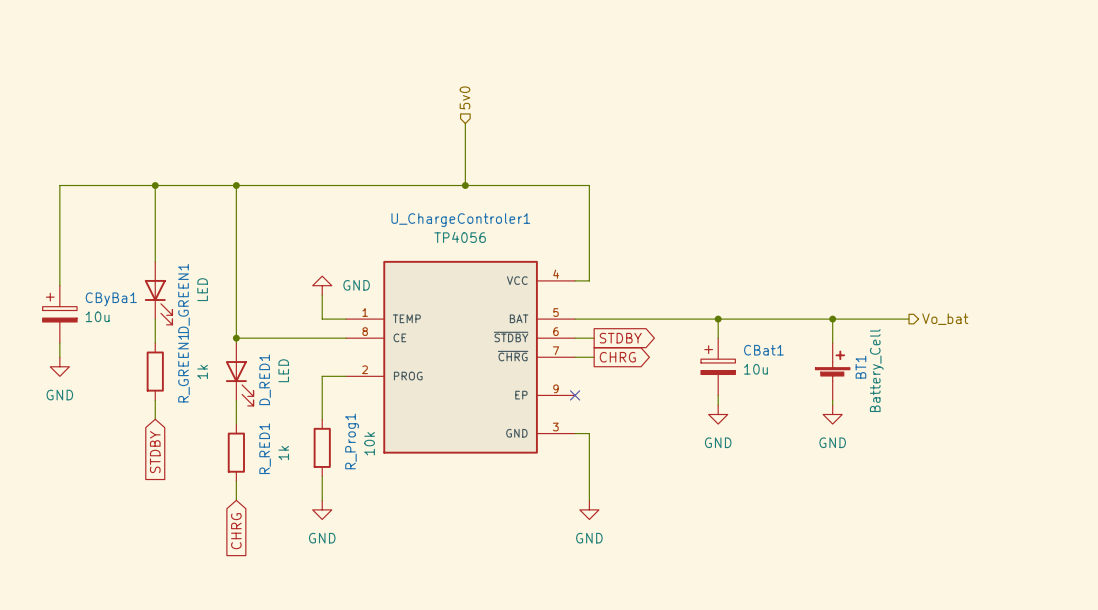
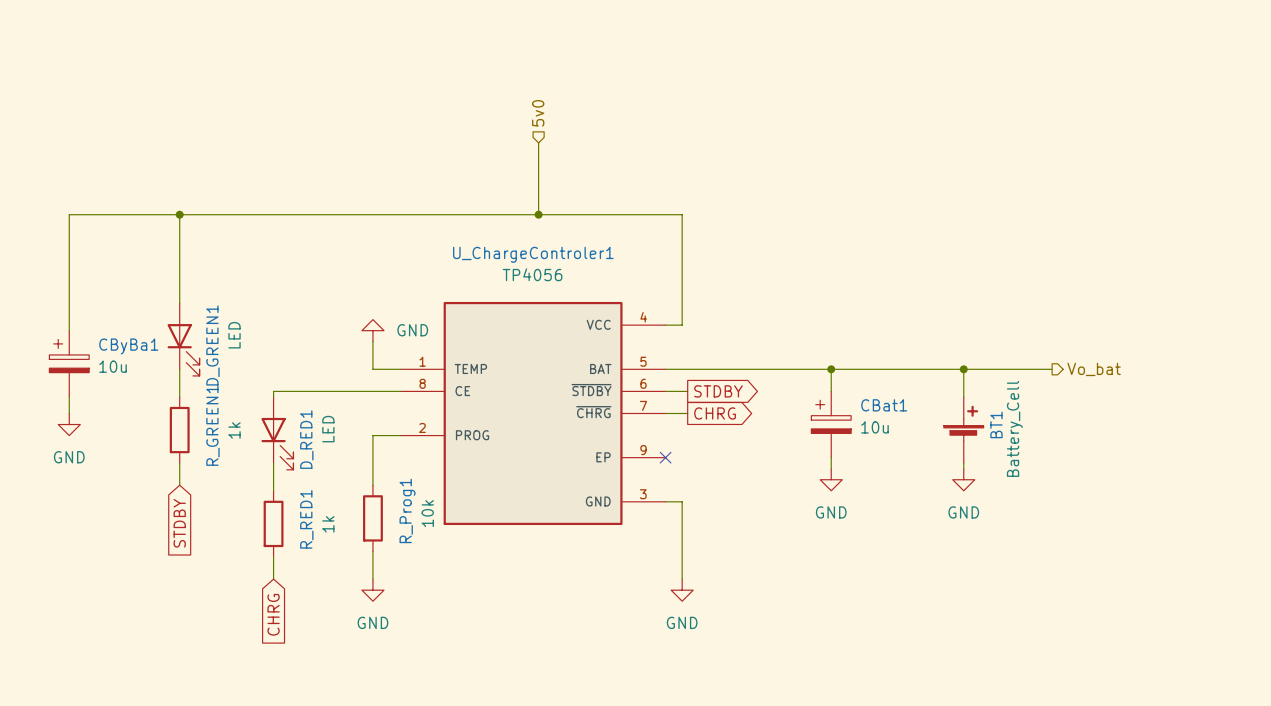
wire: (236, 185) (236, 338) -> none
junction: (236, 185) -> none
junction: (236, 338) -> none

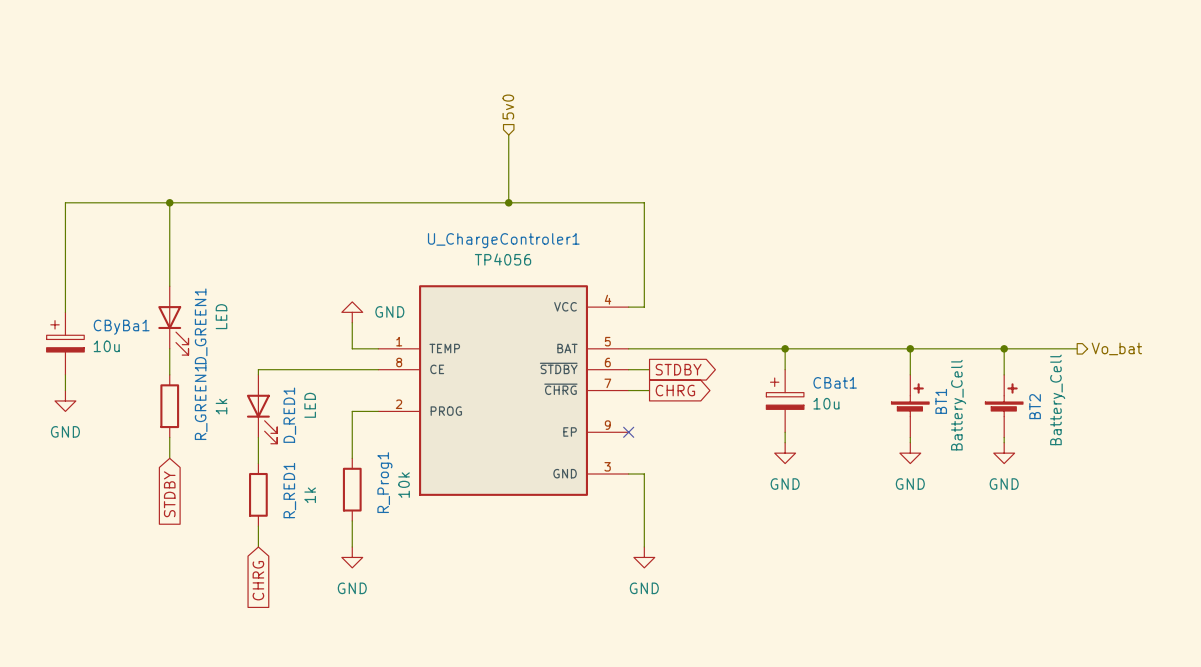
wire: none -> (993, 348) (1077, 348)
wire: none -> (1004, 348) (1004, 374)
junction: none -> (1004, 348)
hierarchical label position: Vo_bat (1094, 369) -> Vo_bat (1116, 348)
BT2: none -> Battery_Cell (1004, 406)
wire: none -> (1004, 437) (1004, 442)
power symbol: none -> GND (1004, 453)

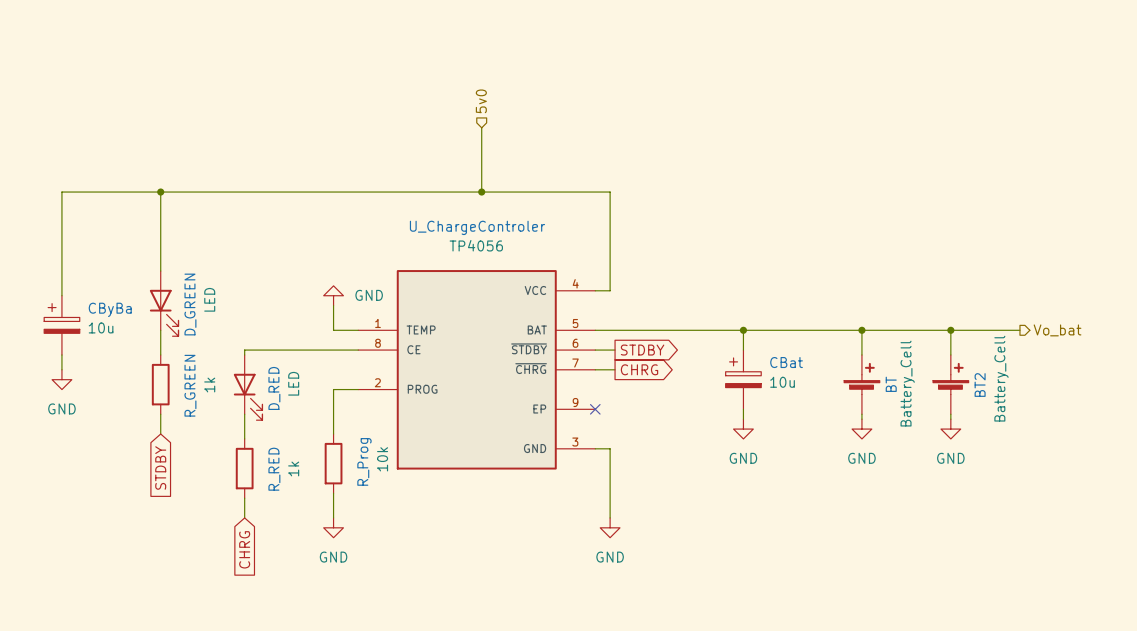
U_ChargeControler1 name: U_ChargeControler1 (503, 240) -> U_ChargeControler (477, 227)
D_GREEN1 name: D_GREEN1 (201, 326) -> D_GREEN (190, 304)
CByBa1 name: CByBa1 (121, 327) -> CByBa (110, 309)
CBat1 name: CBat1 (835, 382) -> CBat (786, 362)
BT1 name: BT1 (941, 401) -> BT (891, 384)
R_GREEN1 name: R_GREEN1 (201, 402) -> R_GREEN (190, 385)
D_RED1 name: D_RED1 (289, 415) -> D_RED (274, 388)
R_Prog1 name: R_Prog1 (384, 482) -> R_Prog (364, 461)
R_RED1 name: R_RED1 (289, 490) -> R_RED (274, 469)

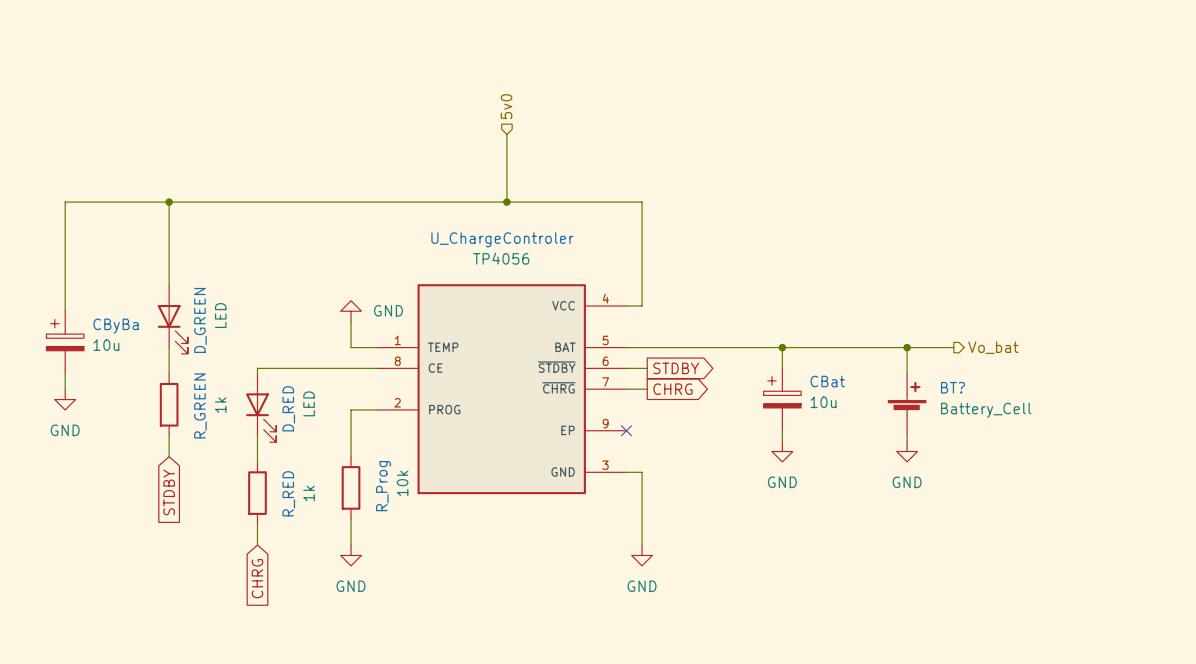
wire: (906, 330) (1019, 330) -> none
wire: (950, 330) (950, 354) -> none
junction: (950, 330) -> none
hierarchical label position: Vo_bat (1057, 330) -> Vo_bat (993, 347)
BT value rotation: 0° (907, 383) -> 90° clockwise (986, 410)
BT name: BT (891, 384) -> BT? (952, 387)
BT2: Battery_Cell (950, 384) -> none
wire: (950, 414) (950, 419) -> none
power symbol: GND (950, 429) -> none

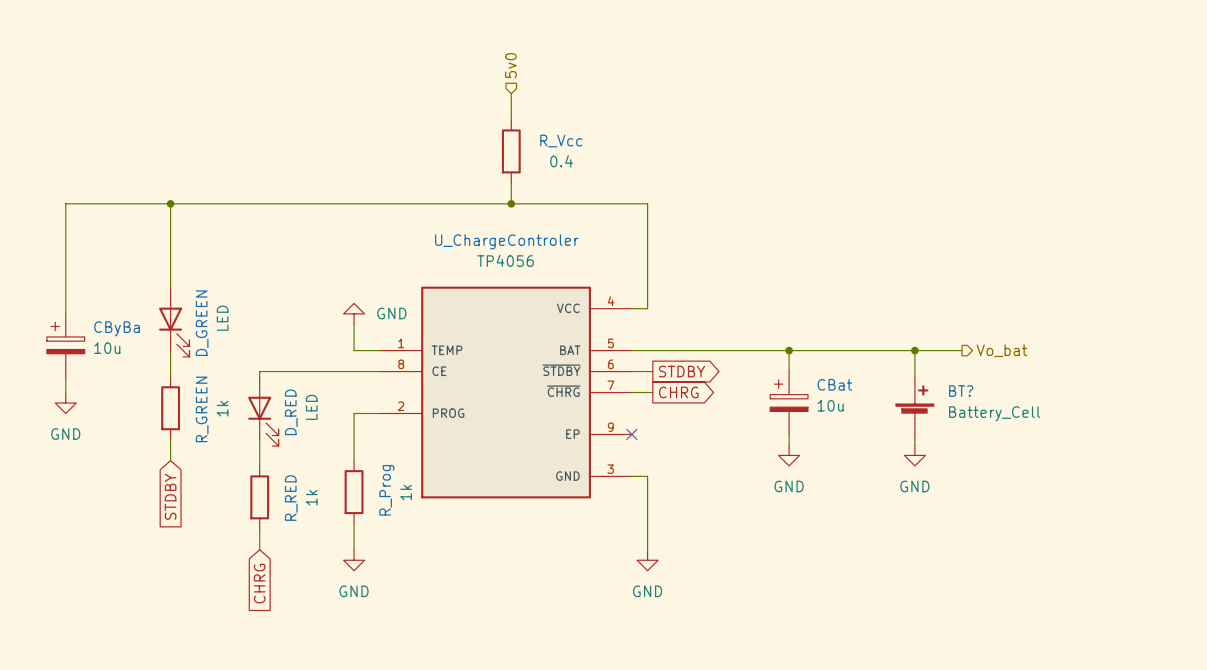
wire: none -> (511, 93) (511, 119)
hierarchical label position: 5v0 (506, 106) -> 5v0 (510, 65)
wire: (506, 134) (506, 181) -> none
R_Vcc: none -> 0.4 (511, 151)
R_Prog value: 10k (402, 483) -> 1k (406, 492)

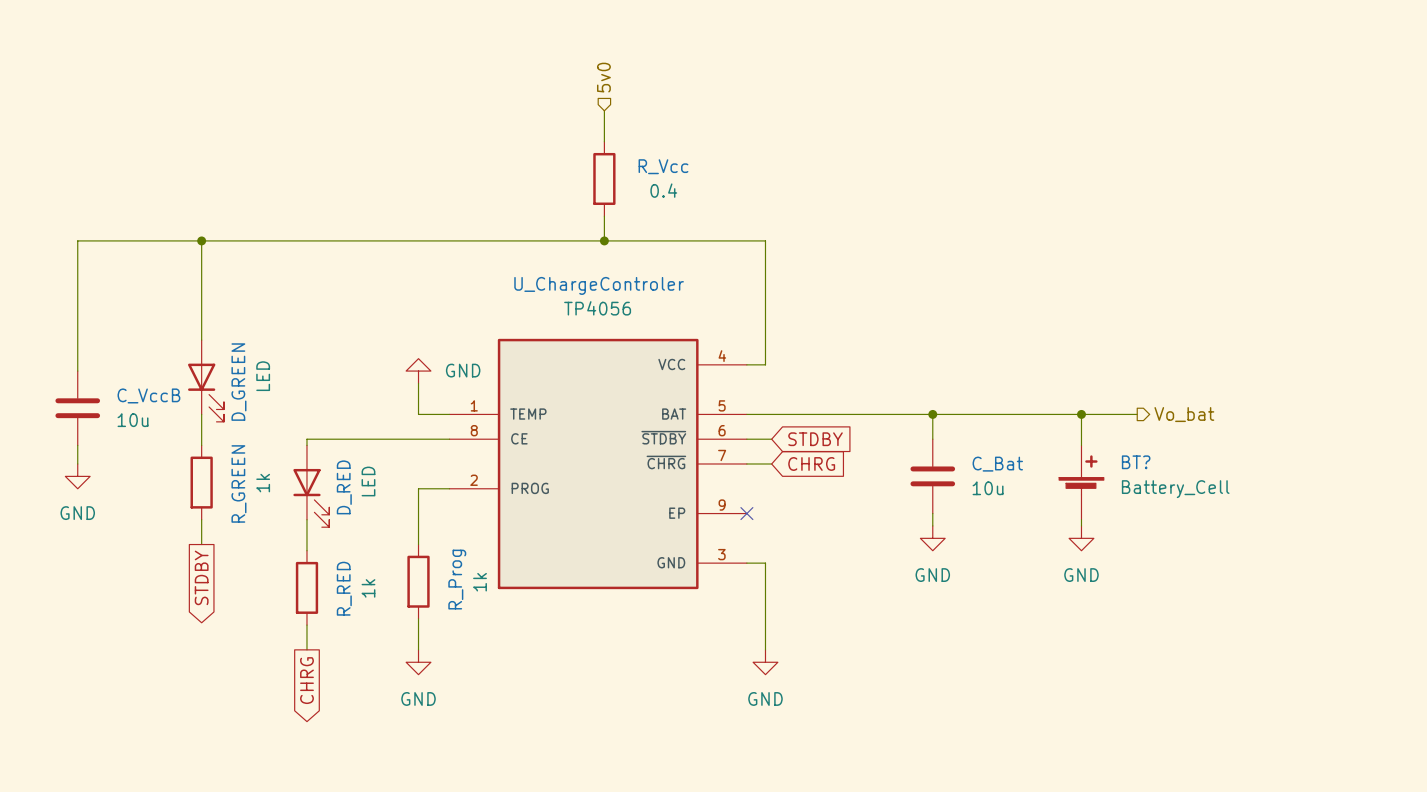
CByBa: 10u (65, 345) -> none
C_VccB: none -> 10u (77, 408)
global label shape: output (682, 371) -> input (815, 439)
global label shape: output (678, 392) -> input (811, 463)
CBat: 10u (789, 403) -> none
C_Bat: none -> 10u (932, 476)
global label shape: input (170, 496) -> output (201, 577)
global label shape: input (259, 583) -> output (306, 680)

